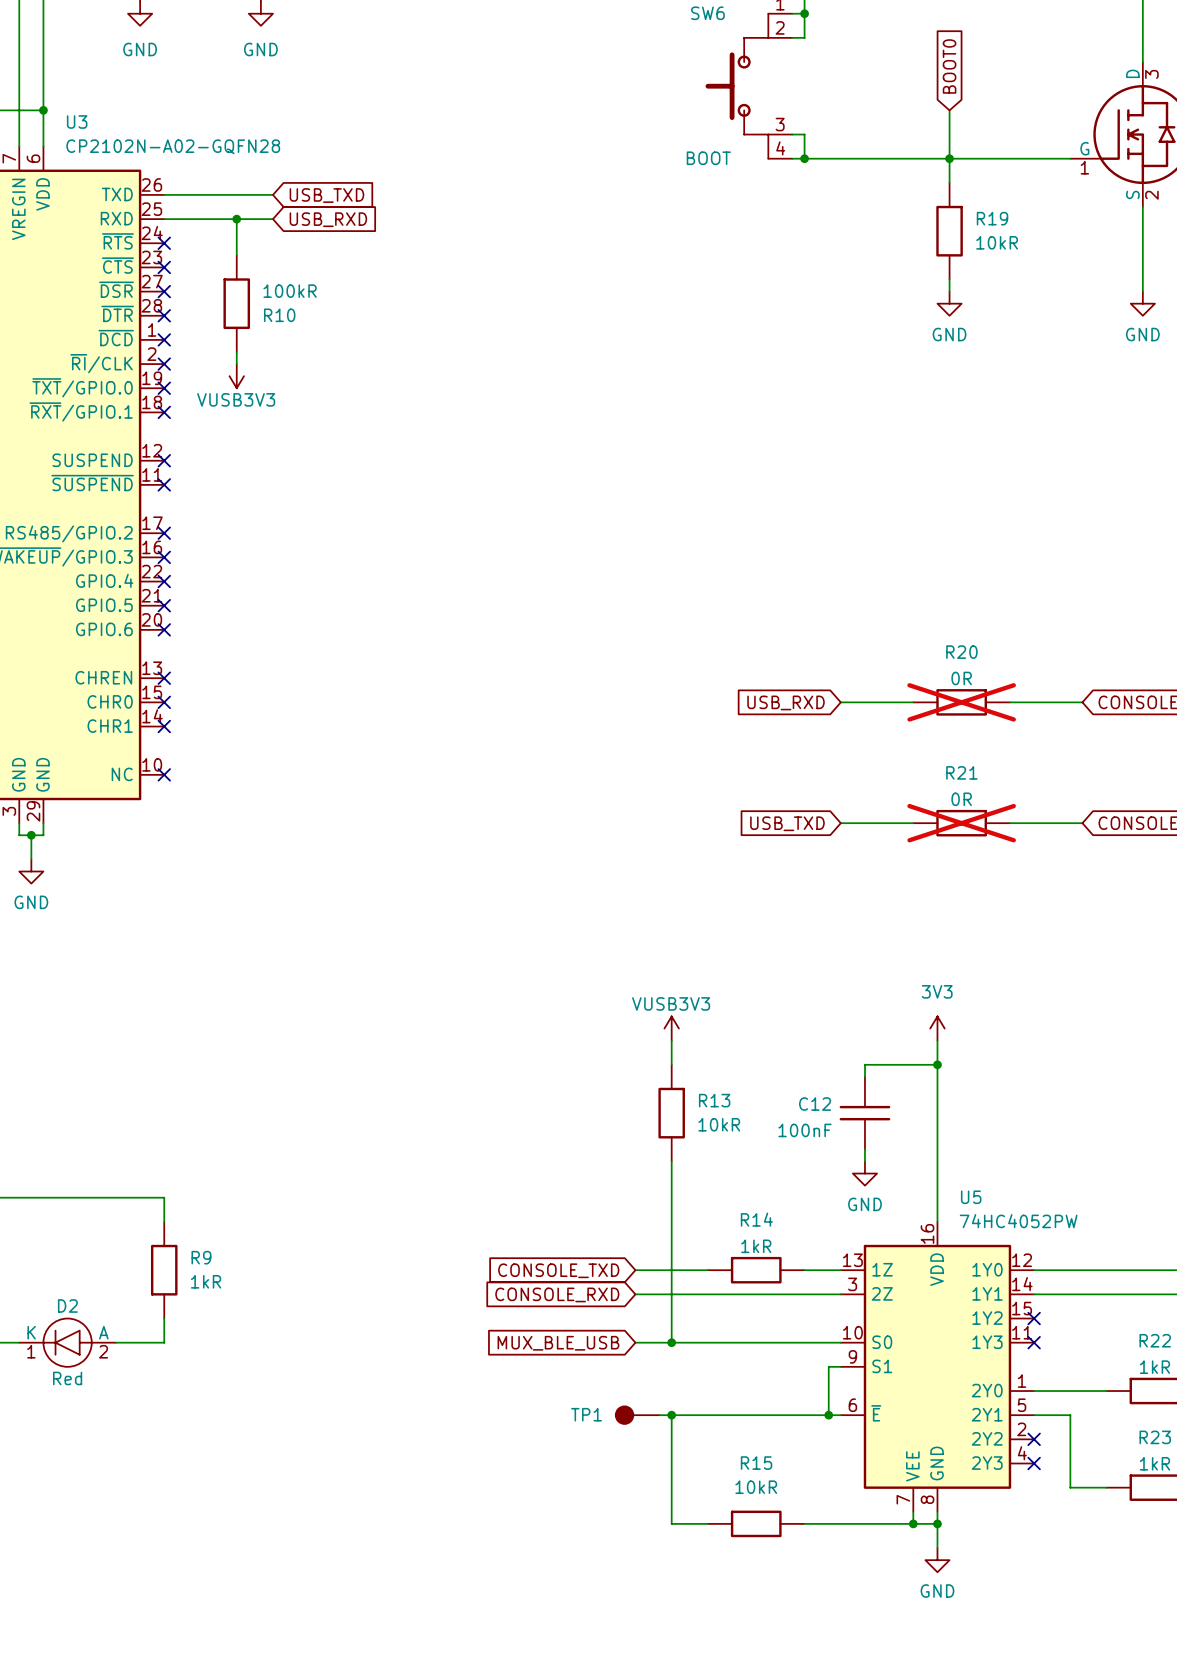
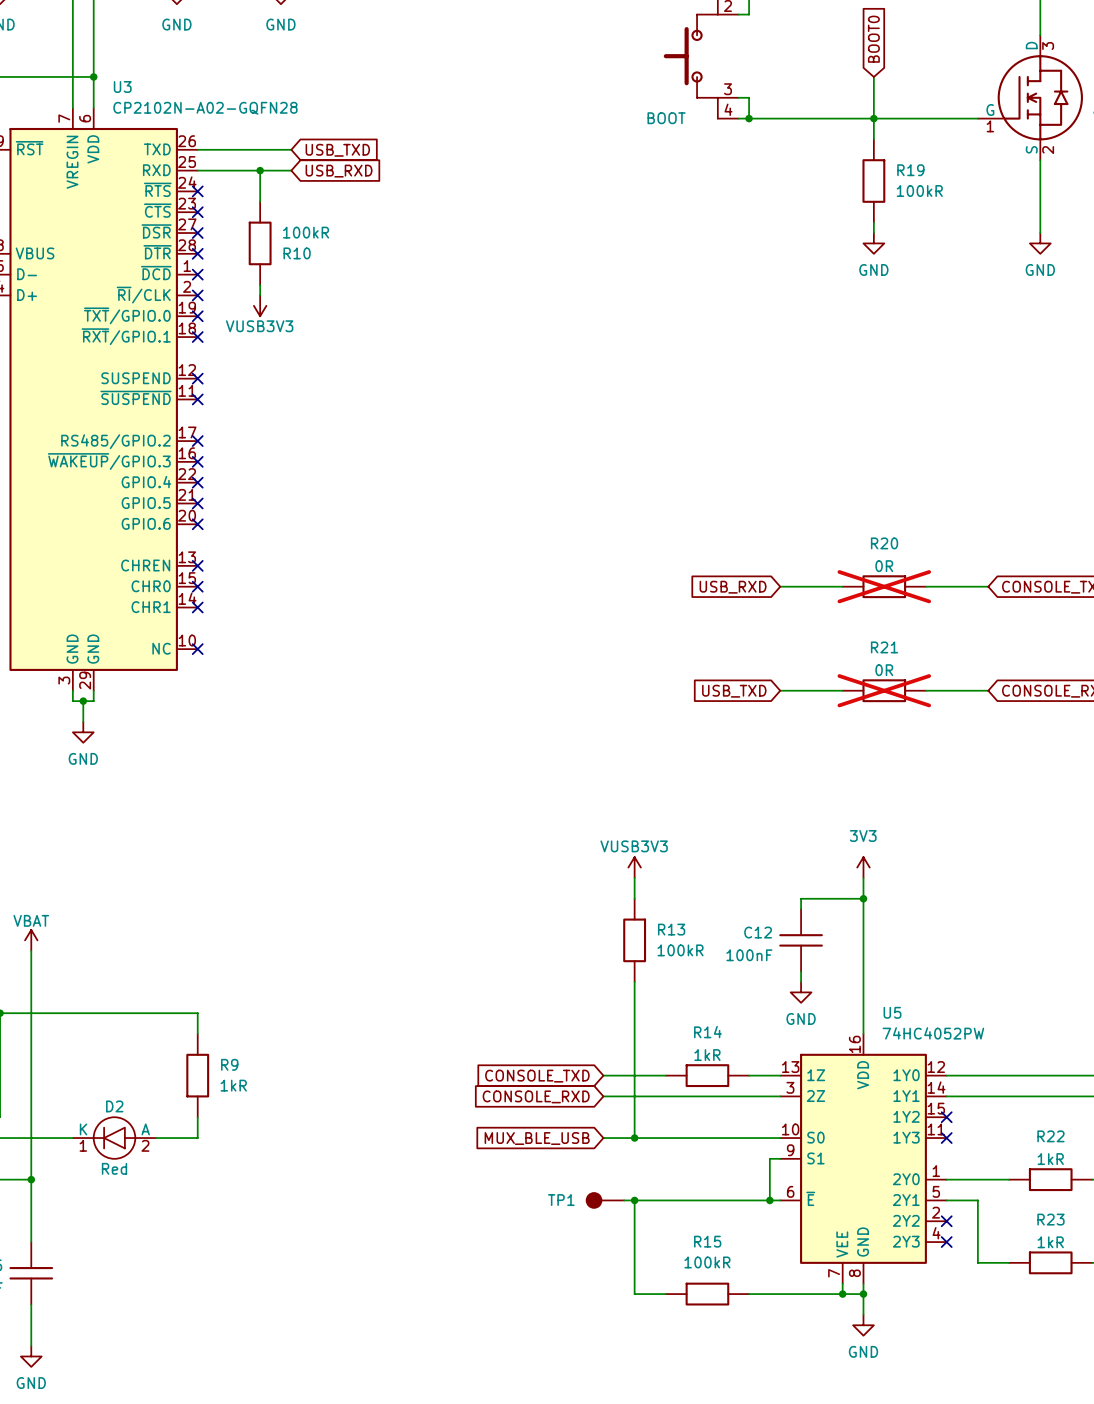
R19 value: 10kR (997, 242) -> 100kR (919, 191)
R13 value: 10kR (719, 1124) -> 100kR (680, 950)
R15 value: 10kR (756, 1487) -> 100kR (707, 1262)

